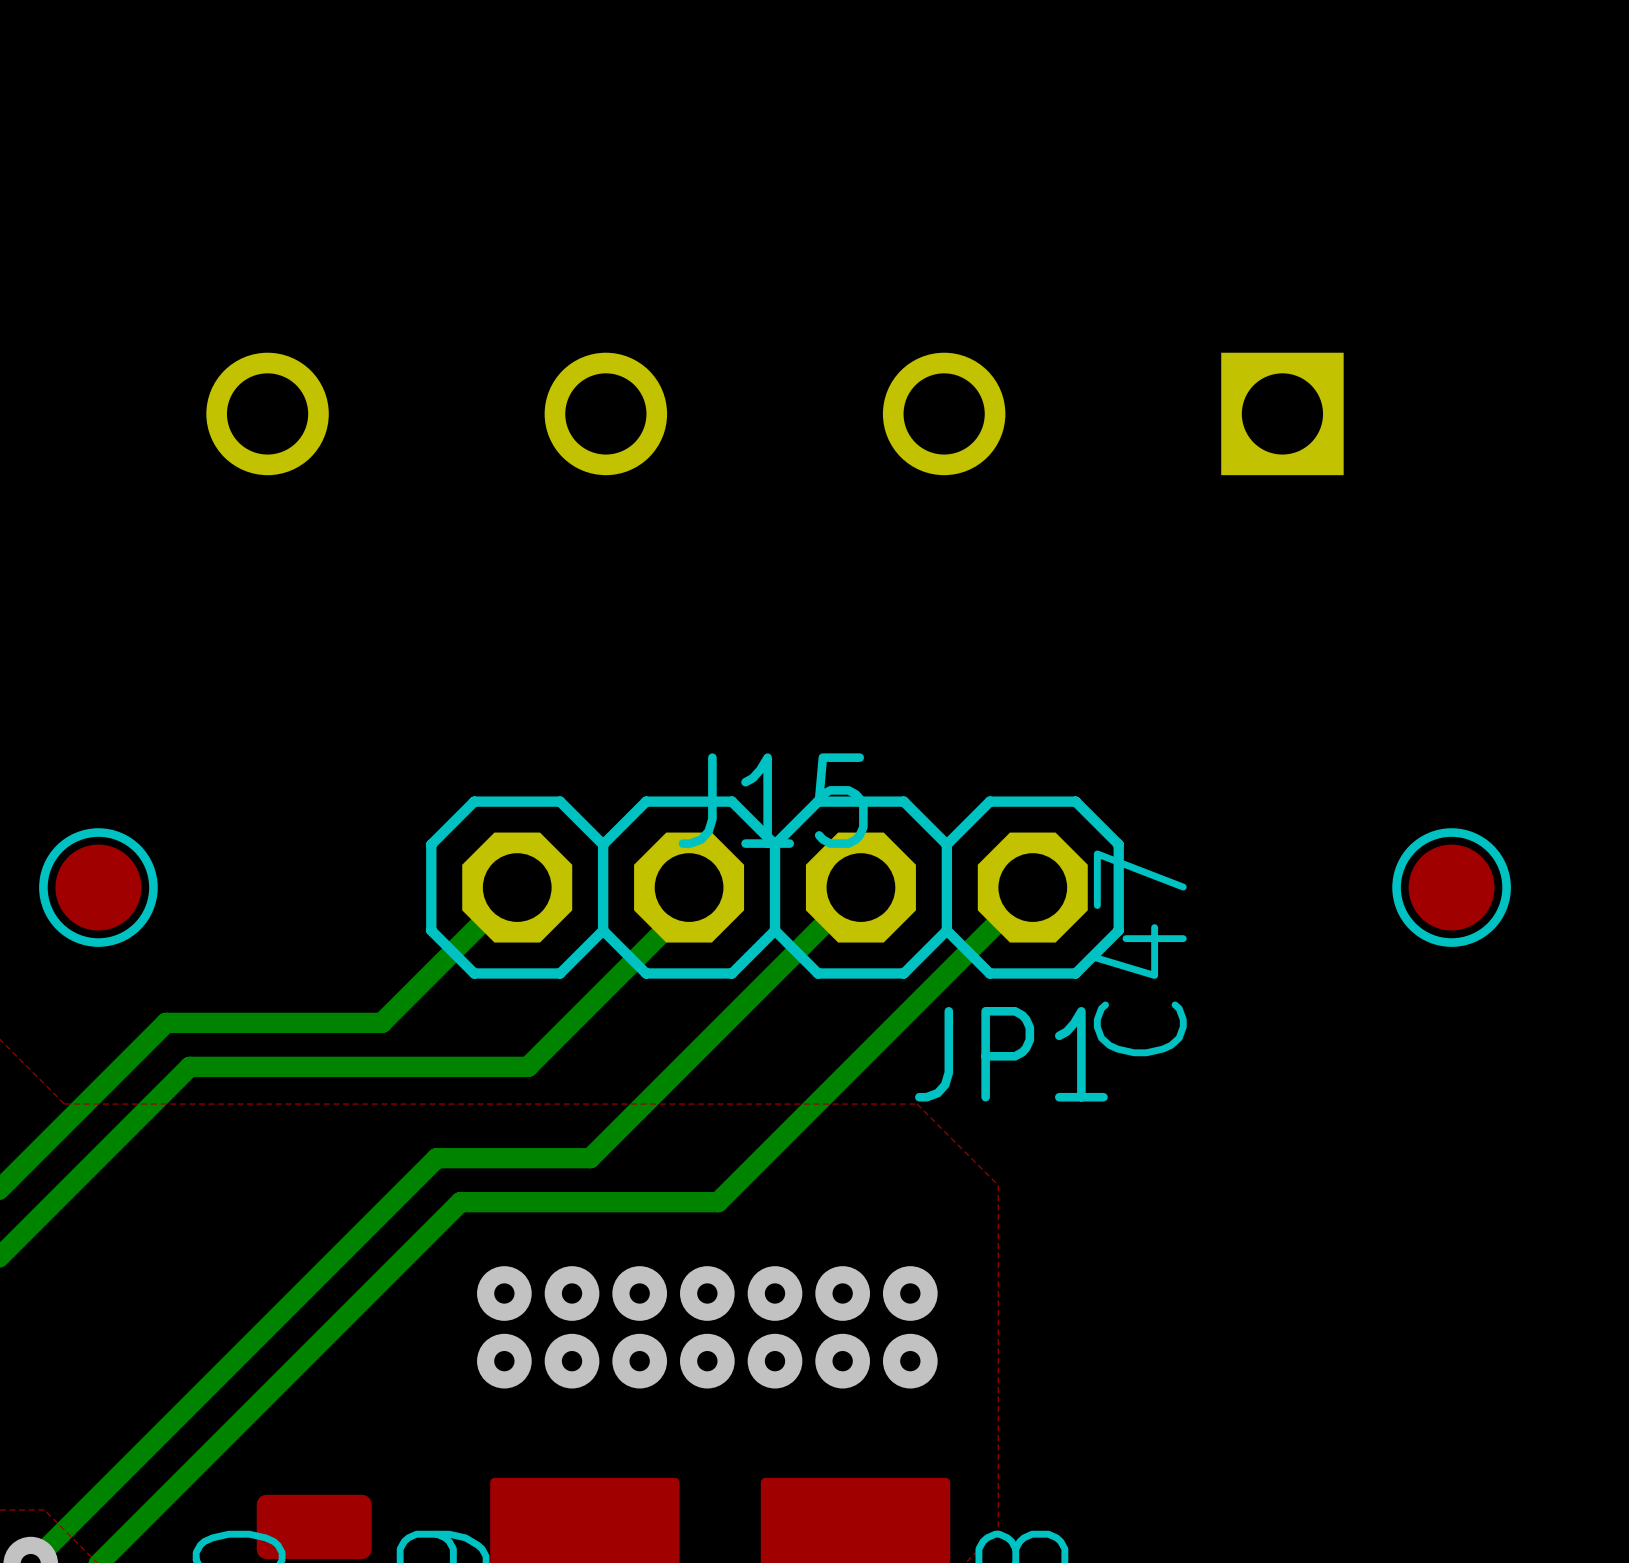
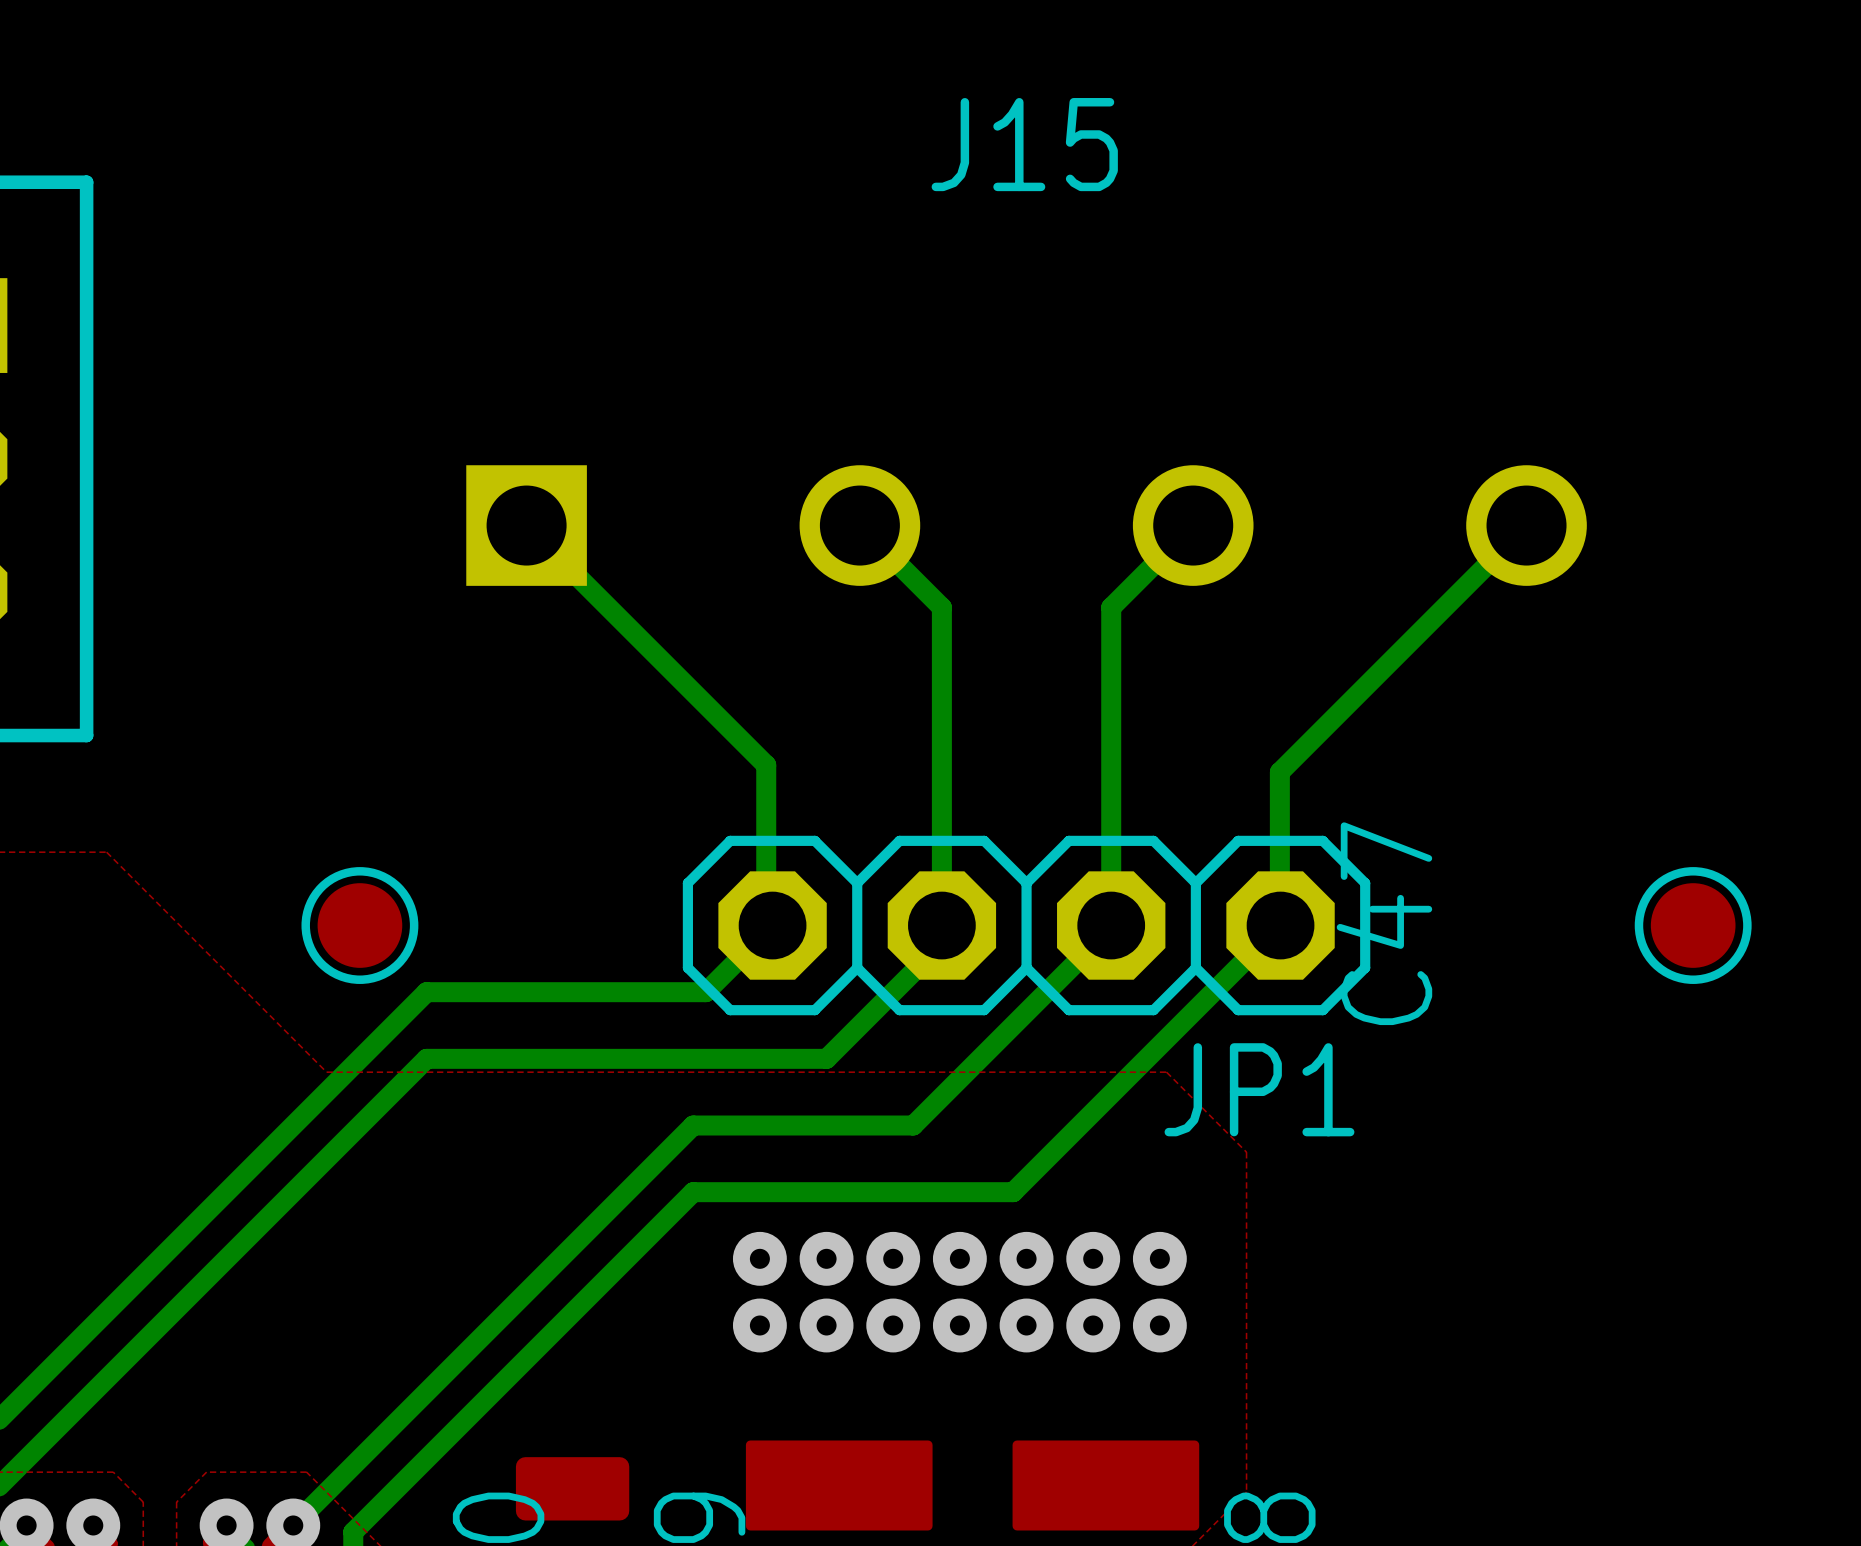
J15 rotation: 0° (775, 413) -> 180° (1026, 525)
bottom track: none -> (526, 525) (766, 765) (766, 931)
bottom track: none -> (859, 525) (941, 607) (941, 858)
part position: (98, 887) -> (359, 925)
bottom track: (517, 887) (381, 1022) -> (772, 925) (705, 992) (639, 992)
JP1 position: (775, 887) -> (1026, 925)
bottom track: (860, 887) (590, 1158) -> (1193, 525) (1111, 607) (1111, 927) (913, 1125) (844, 1125)
bottom track: (1032, 887) (718, 1202) (460, 1202) (436, 1225) -> (1526, 525) (1279, 772) (1279, 925) (1013, 1192) (693, 1192)
part position: (1451, 887) -> (1693, 925)
bottom track: (689, 905) (528, 1066) (189, 1066) (166, 1090) -> (941, 876) (941, 943) (826, 1058) (426, 1058)

